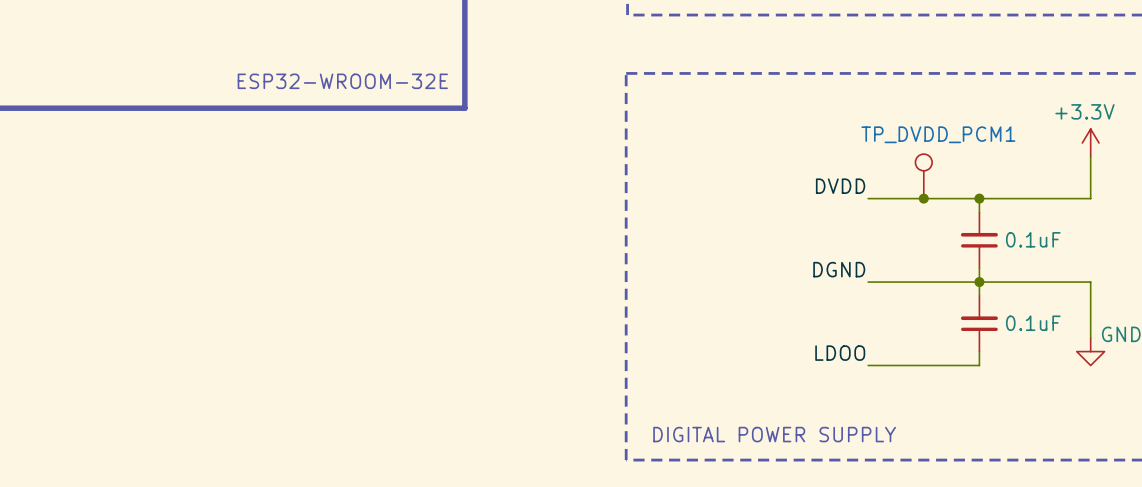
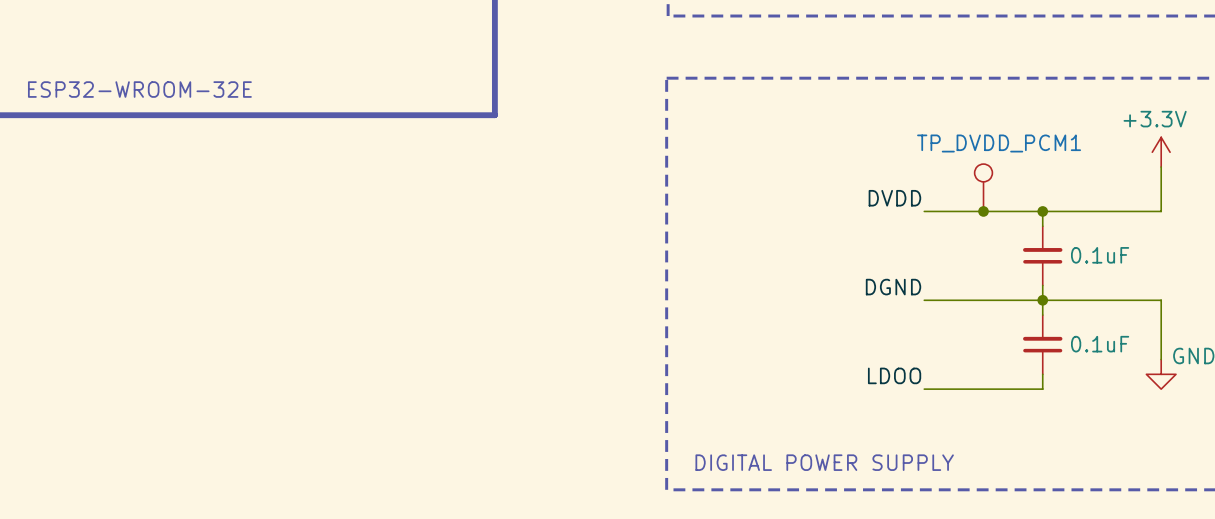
text position: ESP32-WROOM-32E (342, 81) -> ESP32-WROOM-32E (139, 89)

